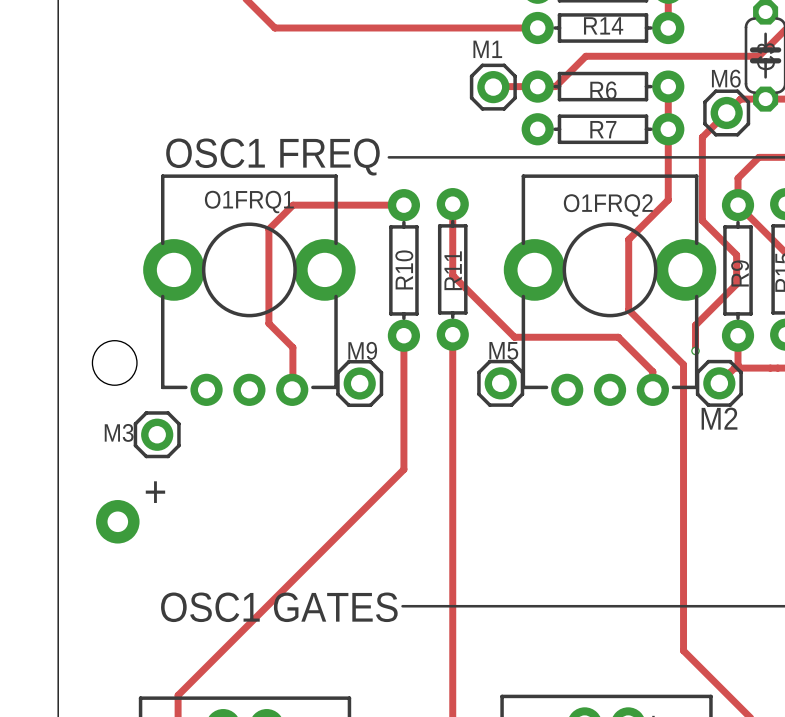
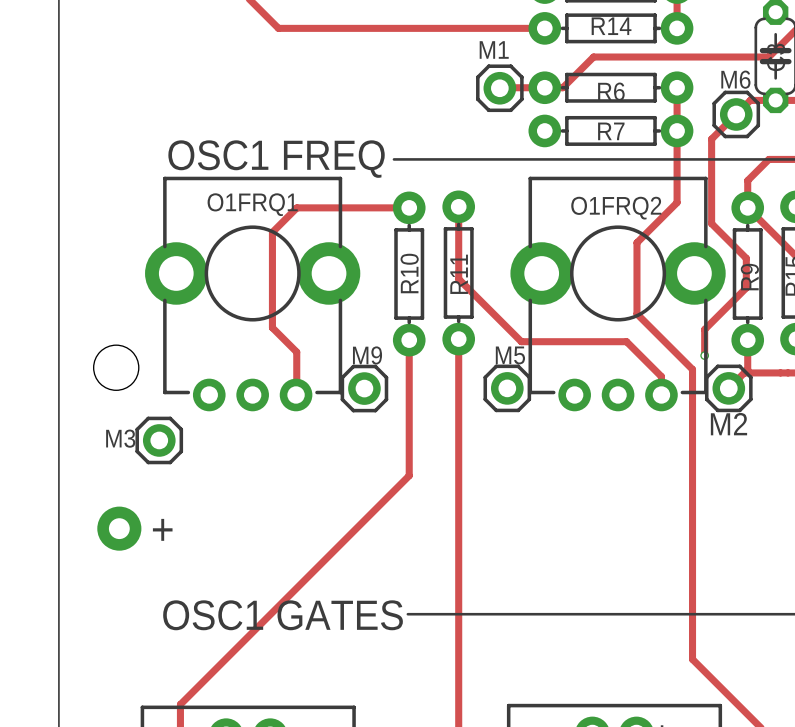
text position: + (155, 492) -> + (162, 529)

